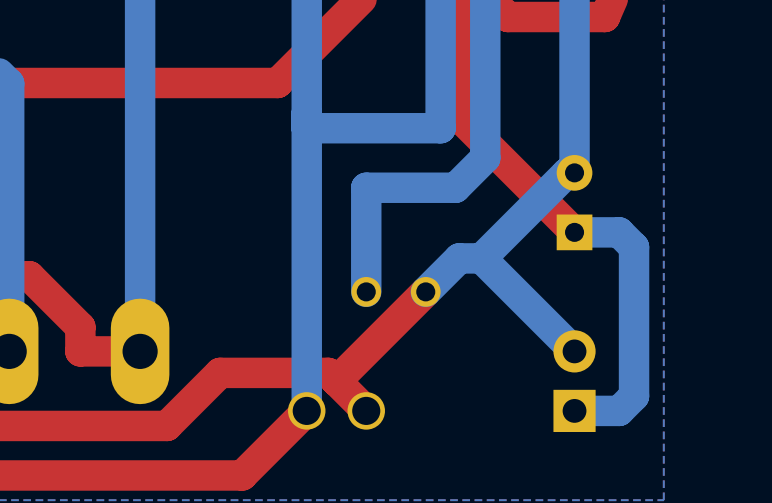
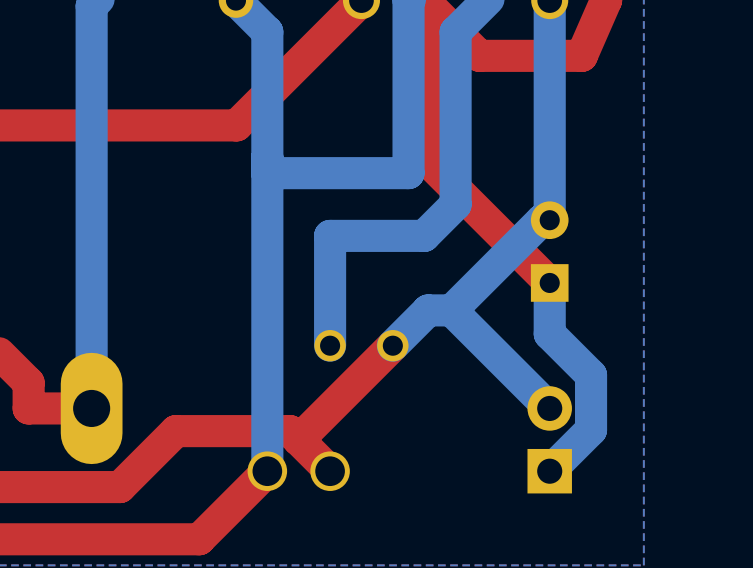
bottom track: (574, 232) (619, 232) (634, 247) (634, 396) (619, 410) (574, 410) -> (549, 282) (549, 333) (591, 375) (591, 429) (549, 471)

